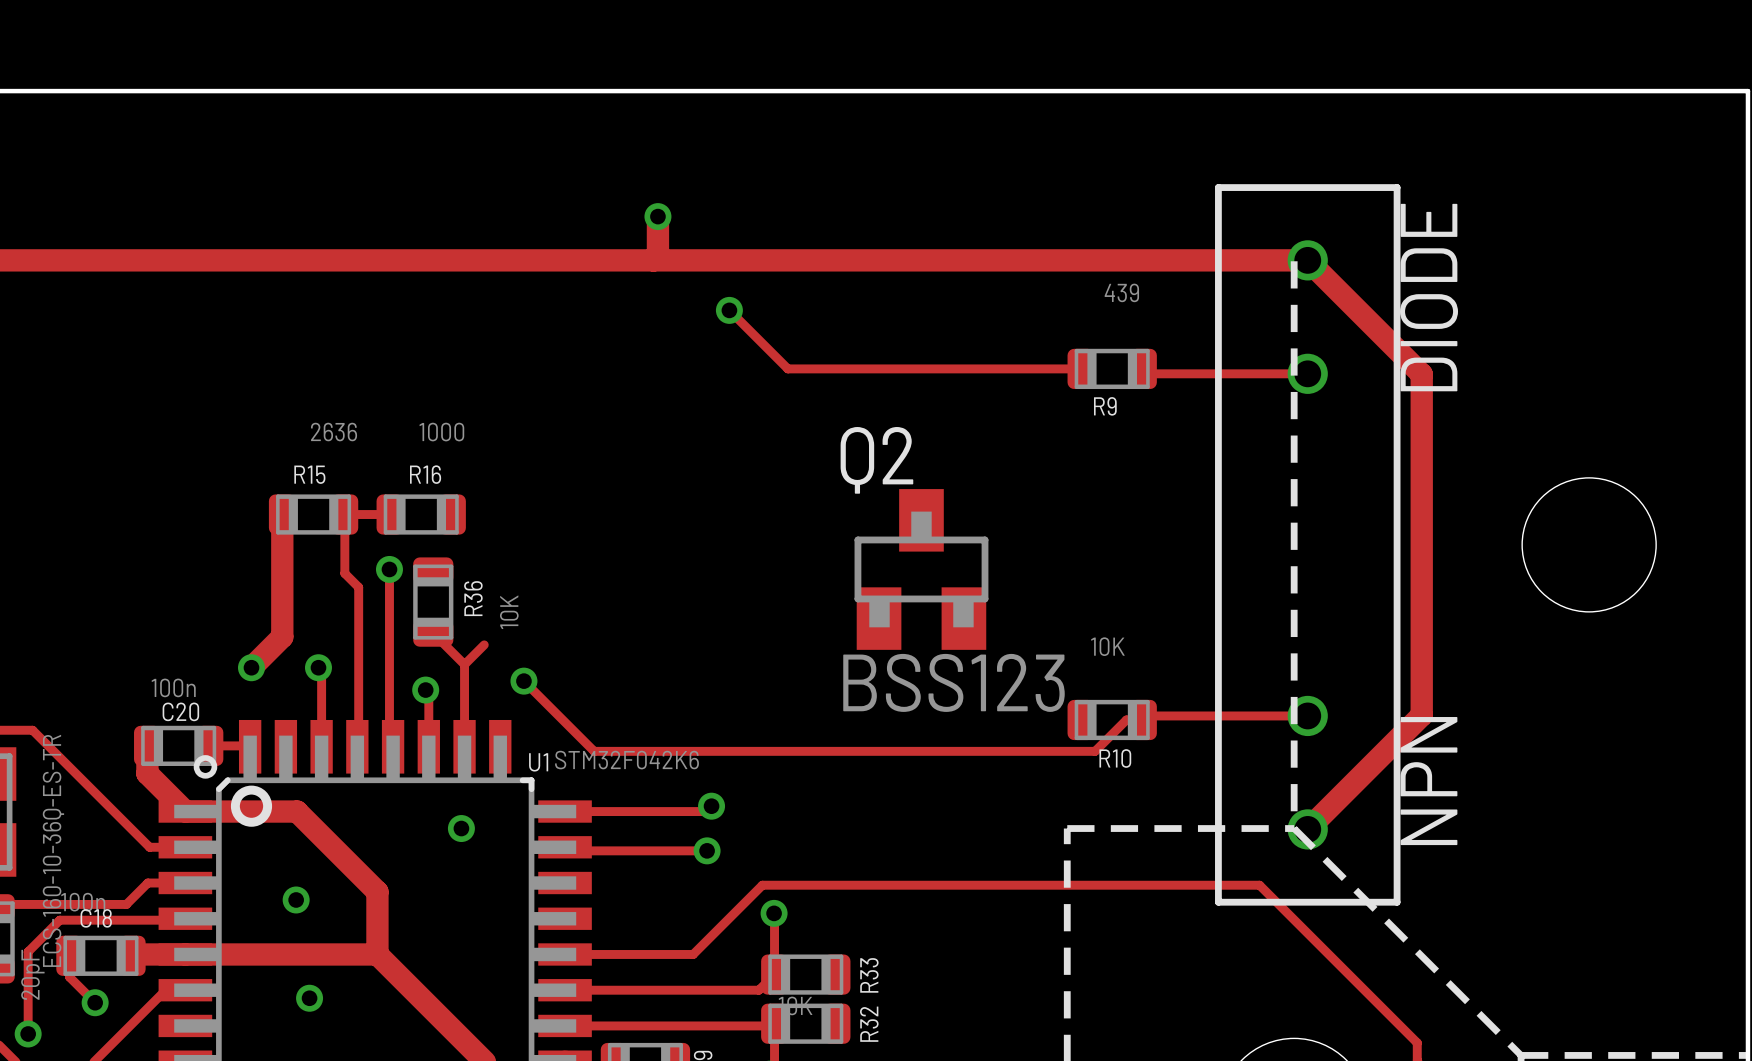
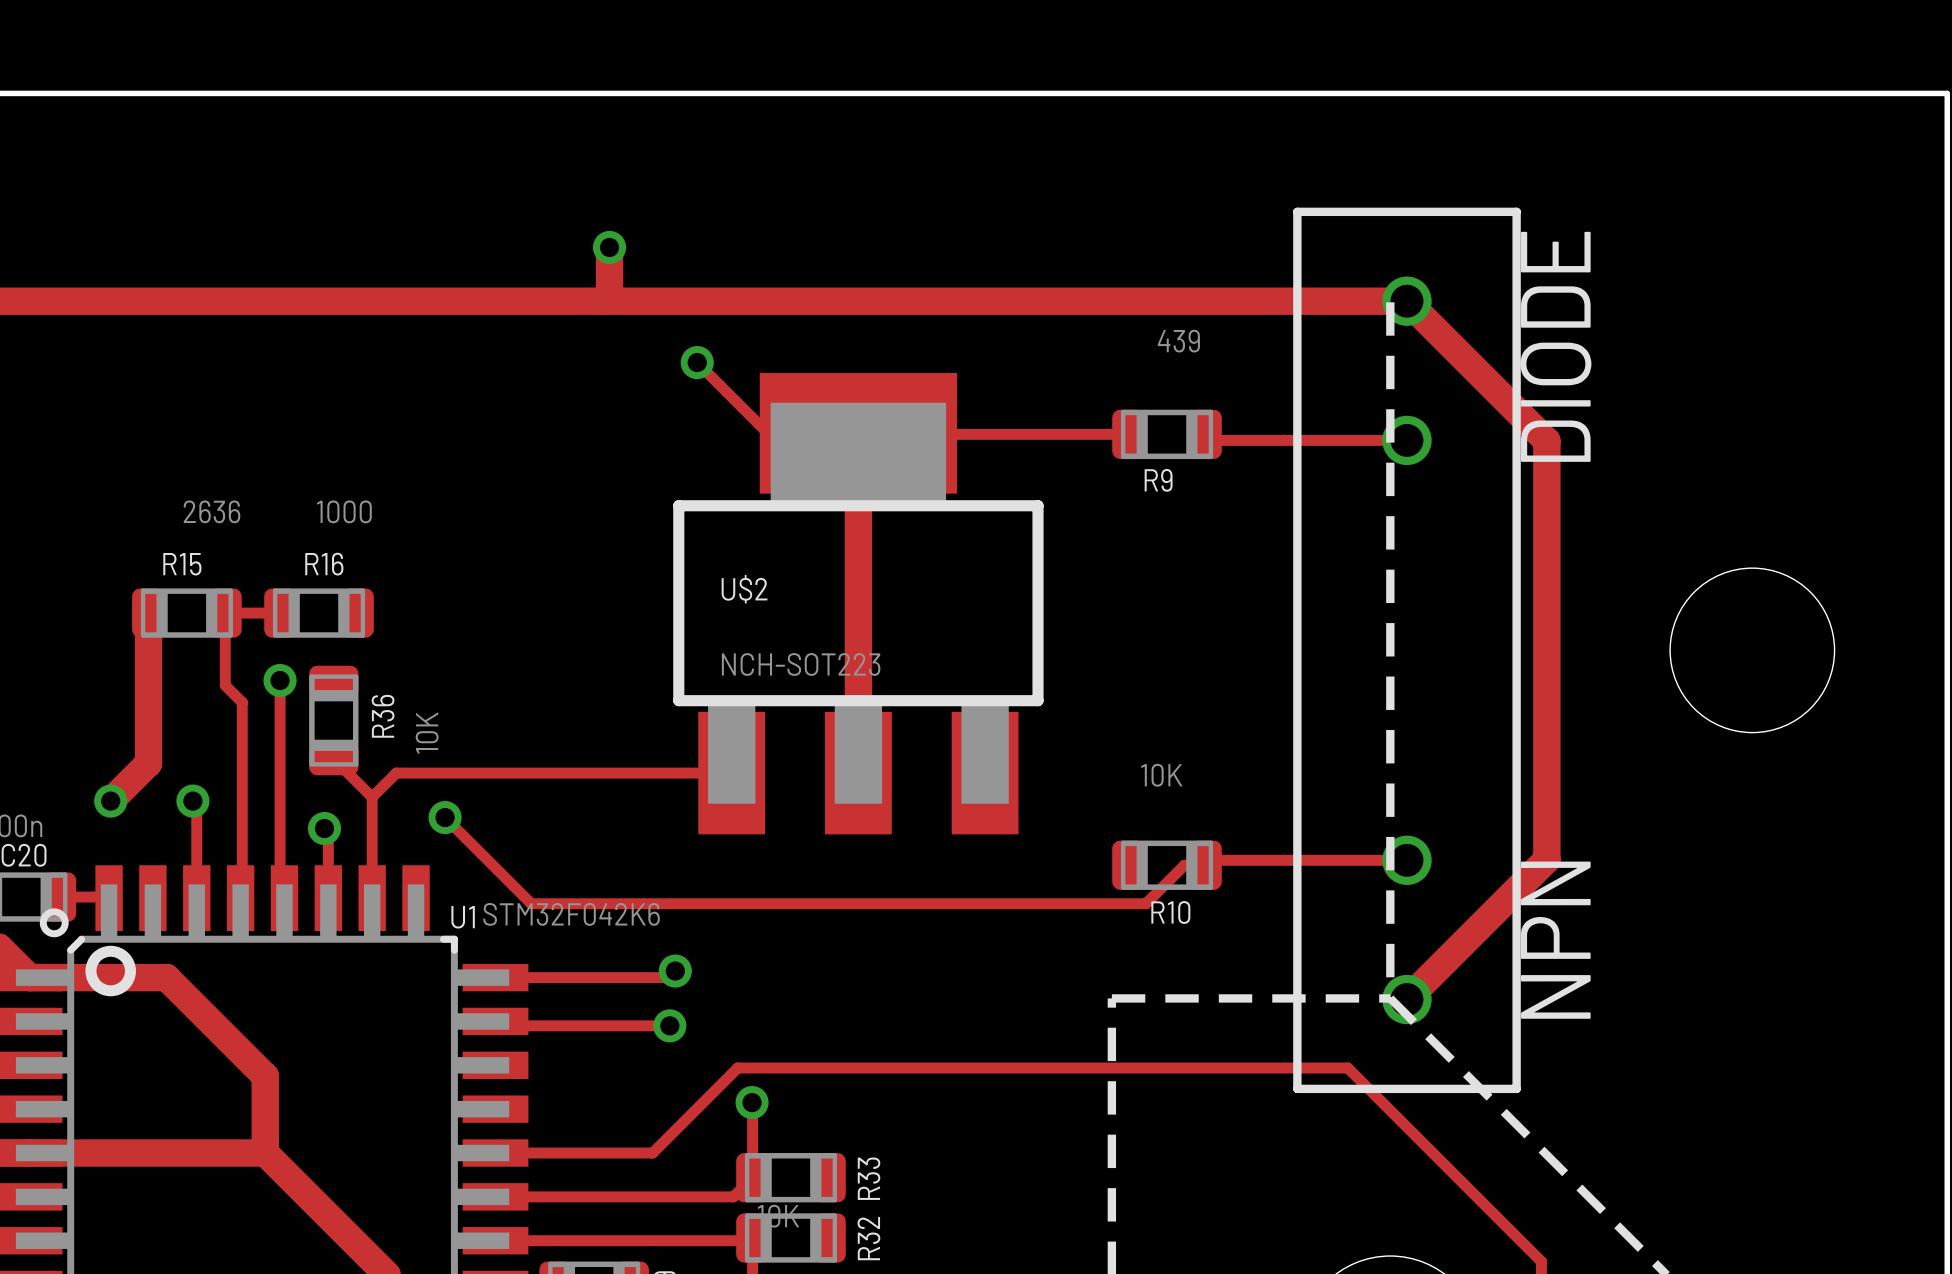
track: none -> (859, 434) (858, 773)
U$2: none -> NCH-SOT223 (858, 603)
Q2: BSS123 (921, 569) -> none
track: none -> (396, 773) (731, 773)
via: (461, 828) -> none
via: (296, 899) -> none
via: (309, 998) -> none

